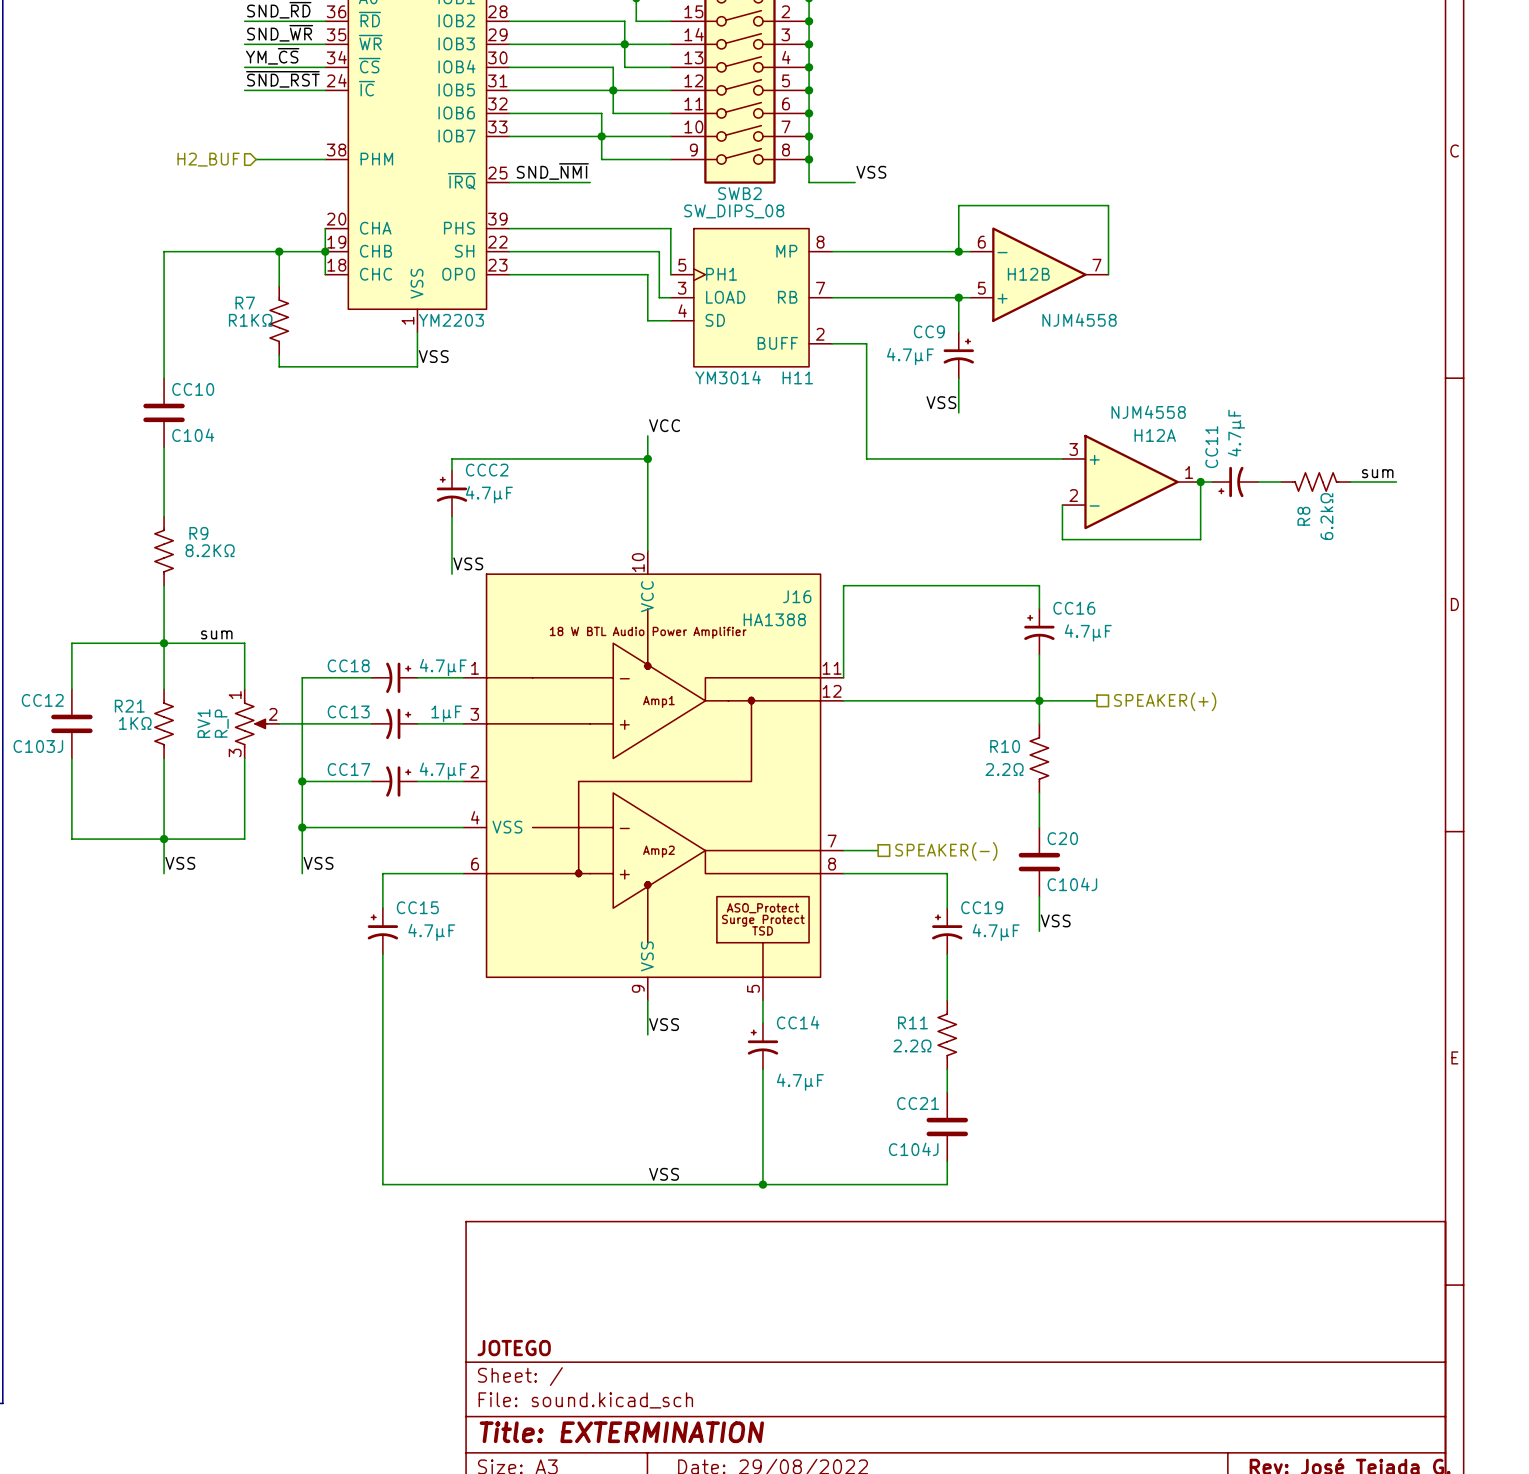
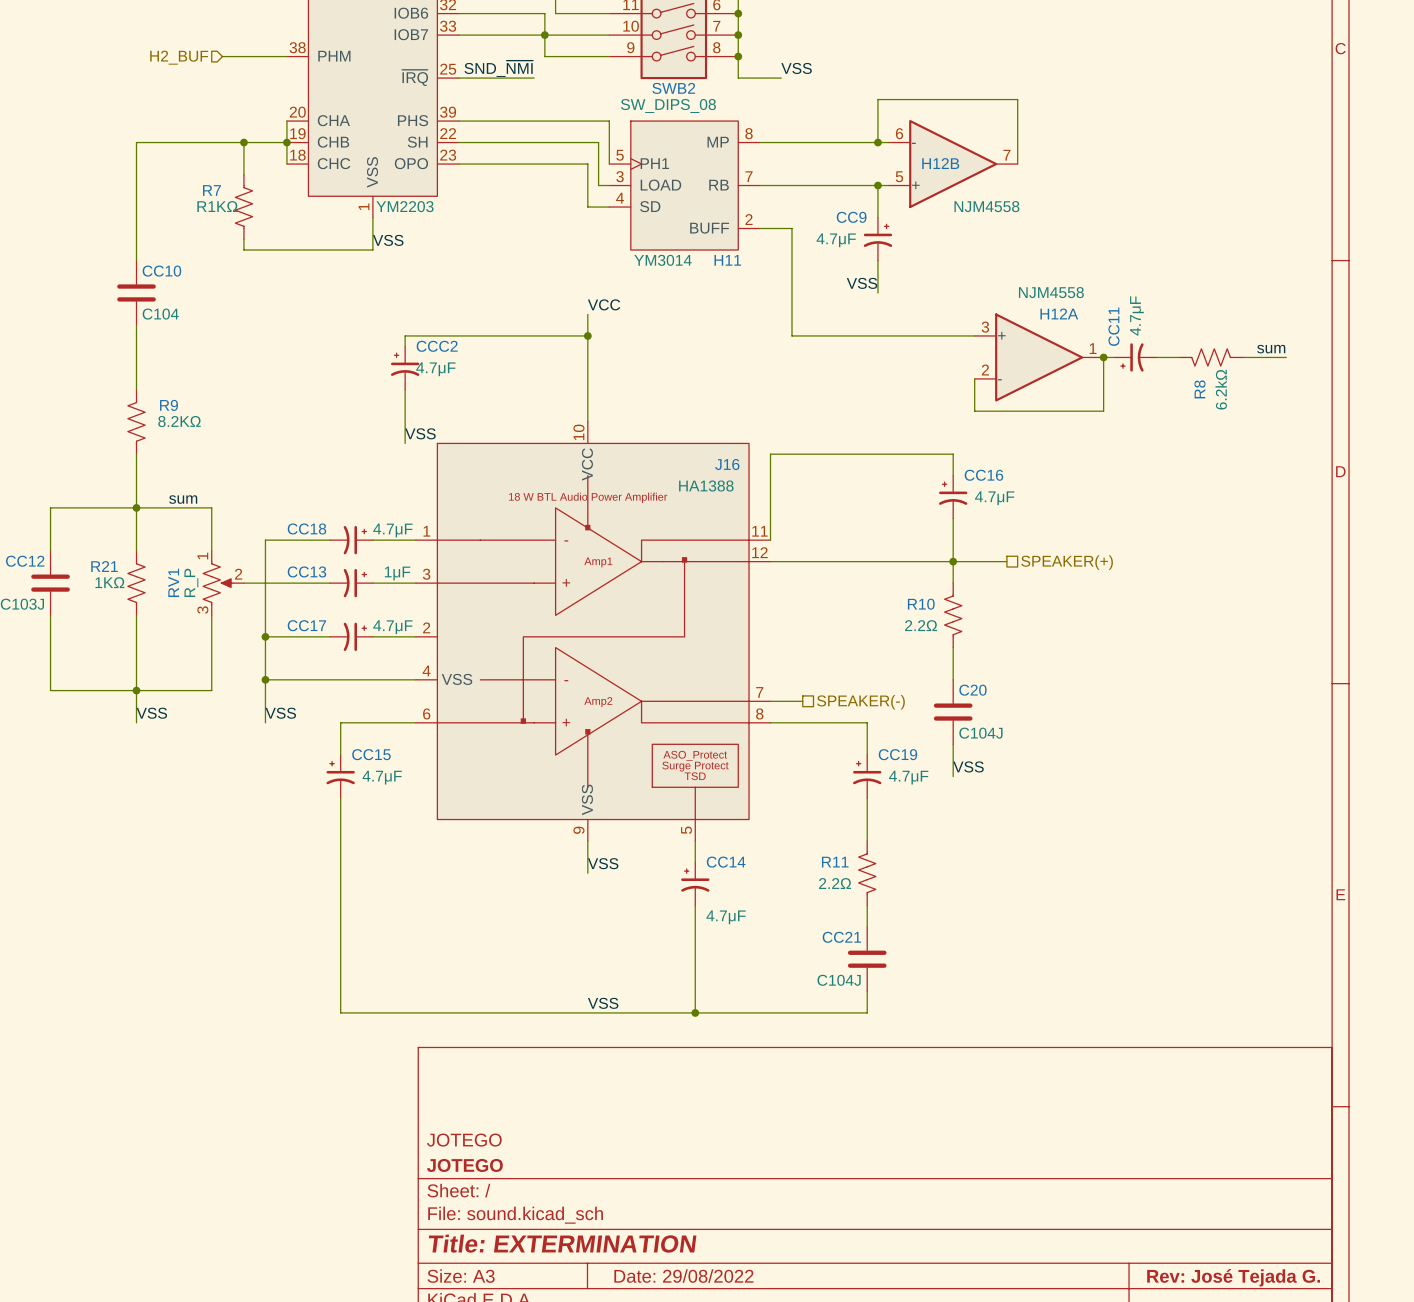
title block: none -> JOTEGO (464, 1140)

